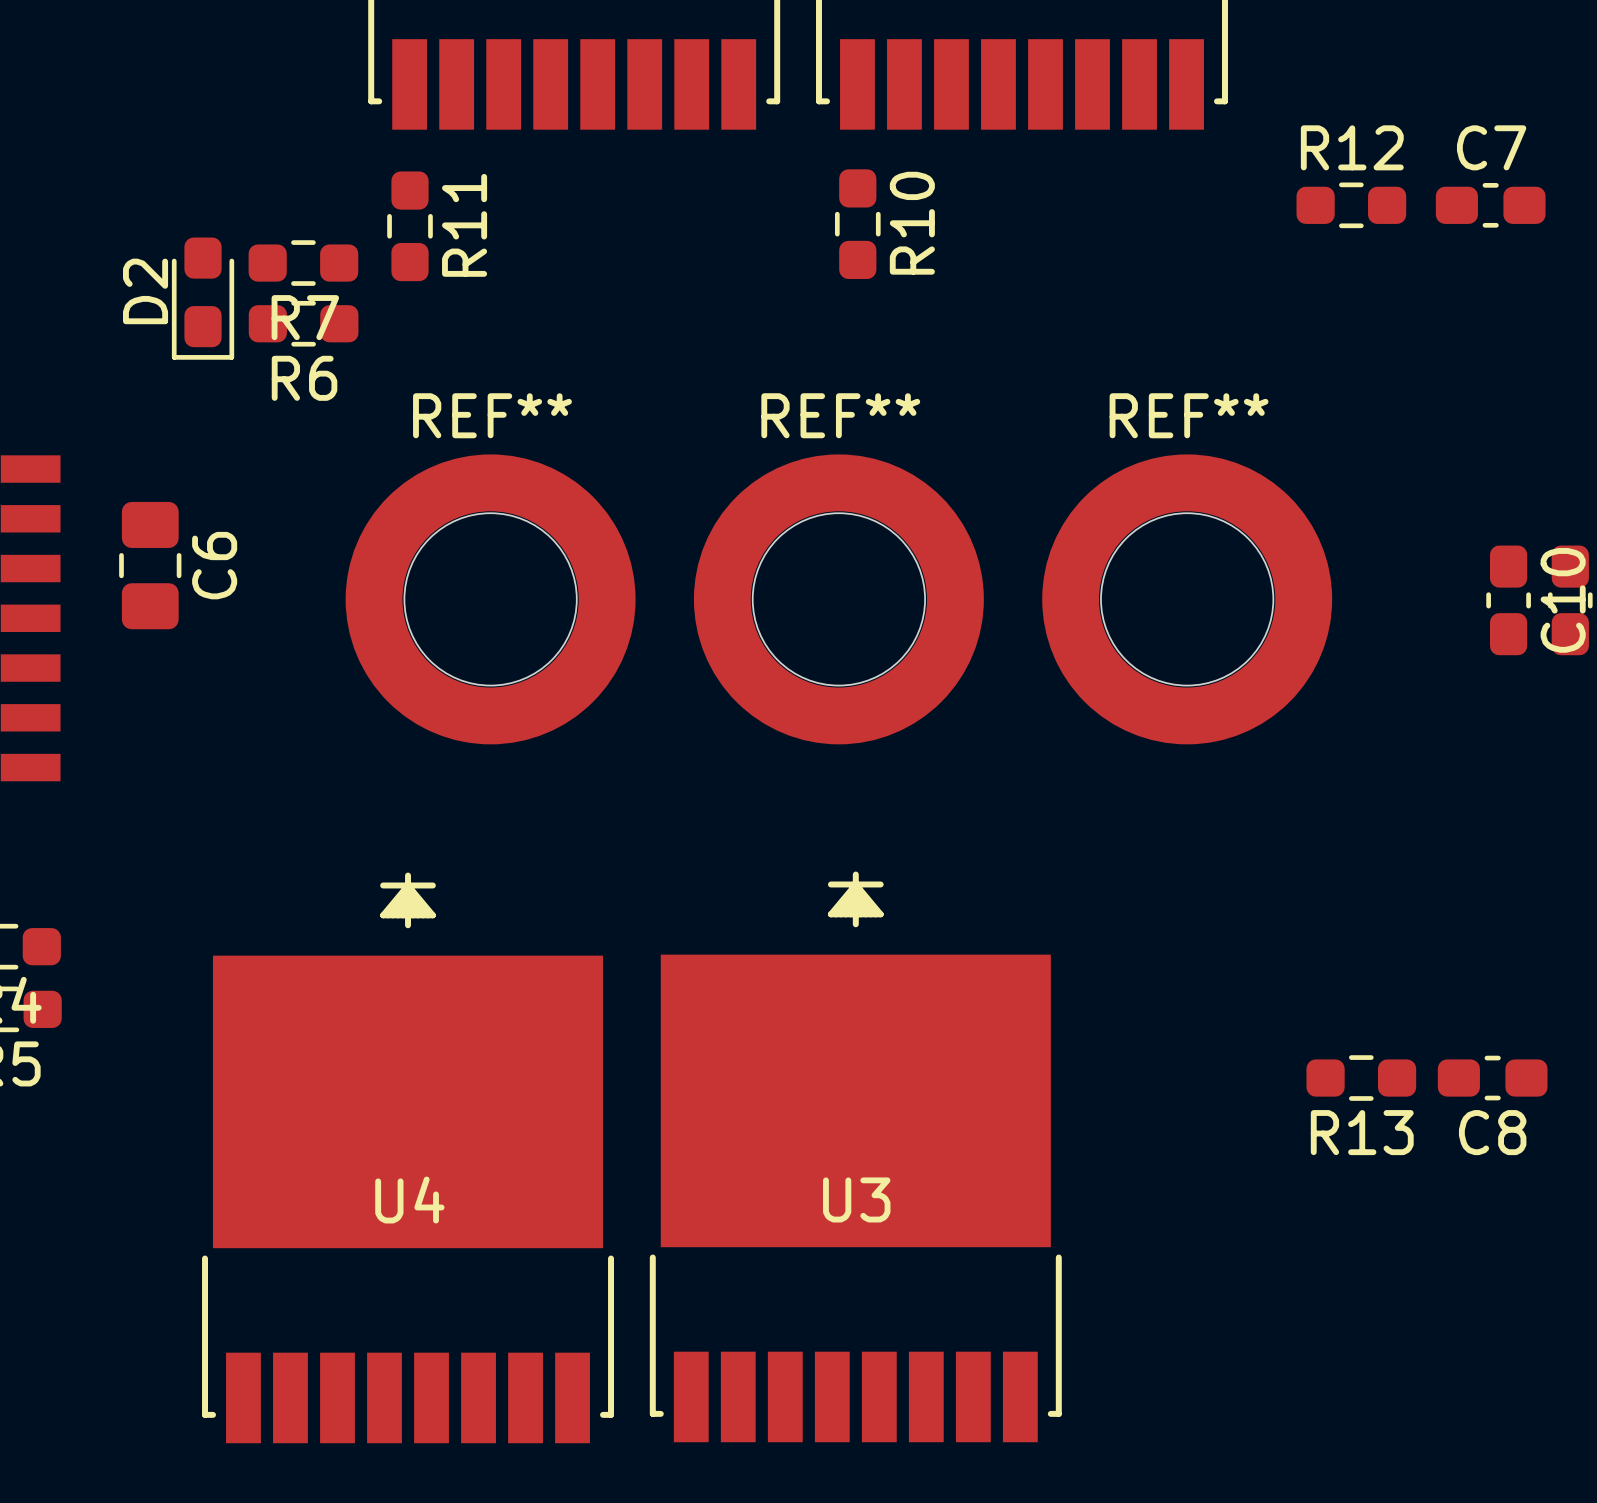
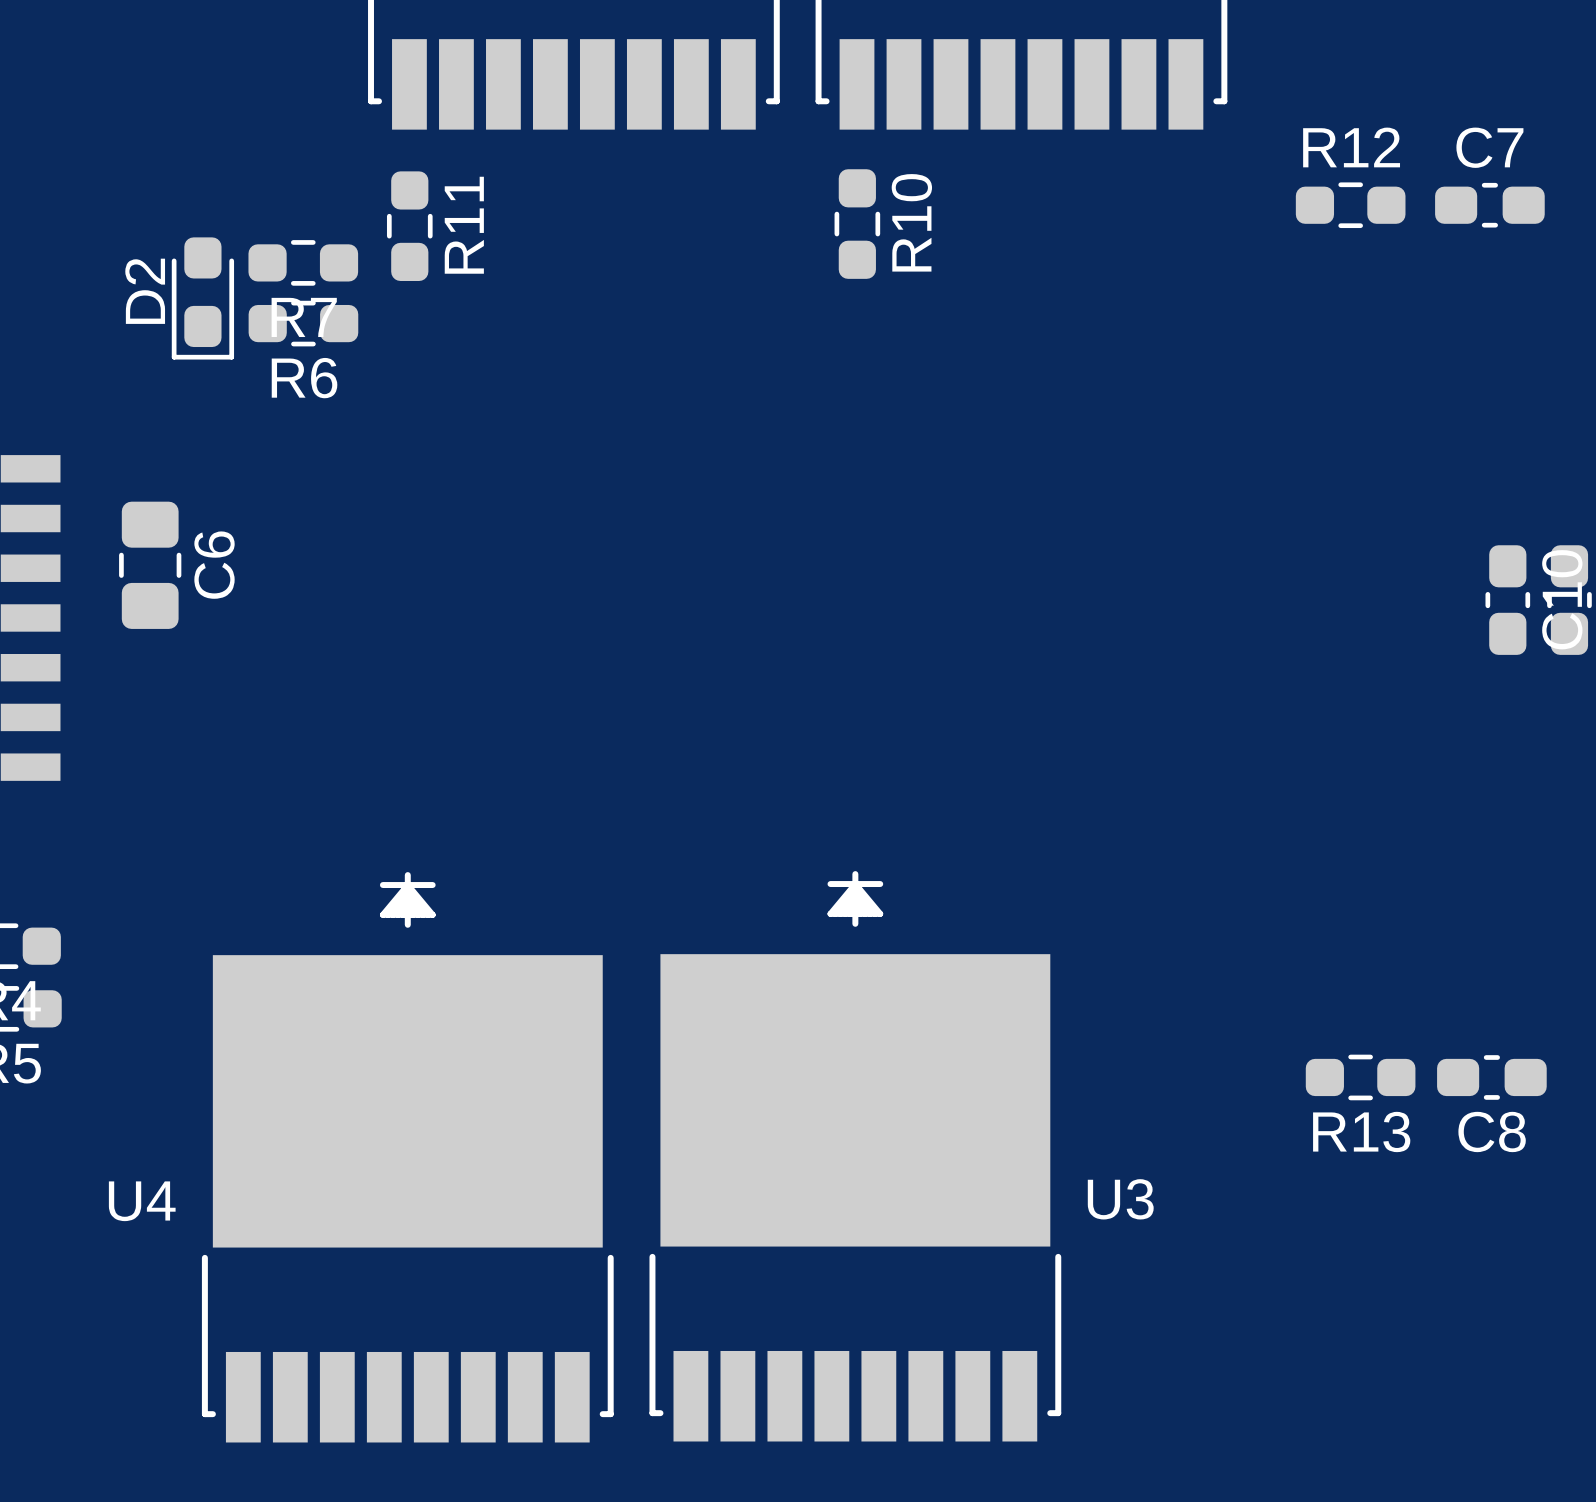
REF**: (490, 599) -> none
REF**: (838, 599) -> none
REF**: (1187, 599) -> none
U3 name position: U3 (856, 1199) -> U3 (1120, 1199)
U4 name position: U4 (409, 1200) -> U4 (142, 1201)

